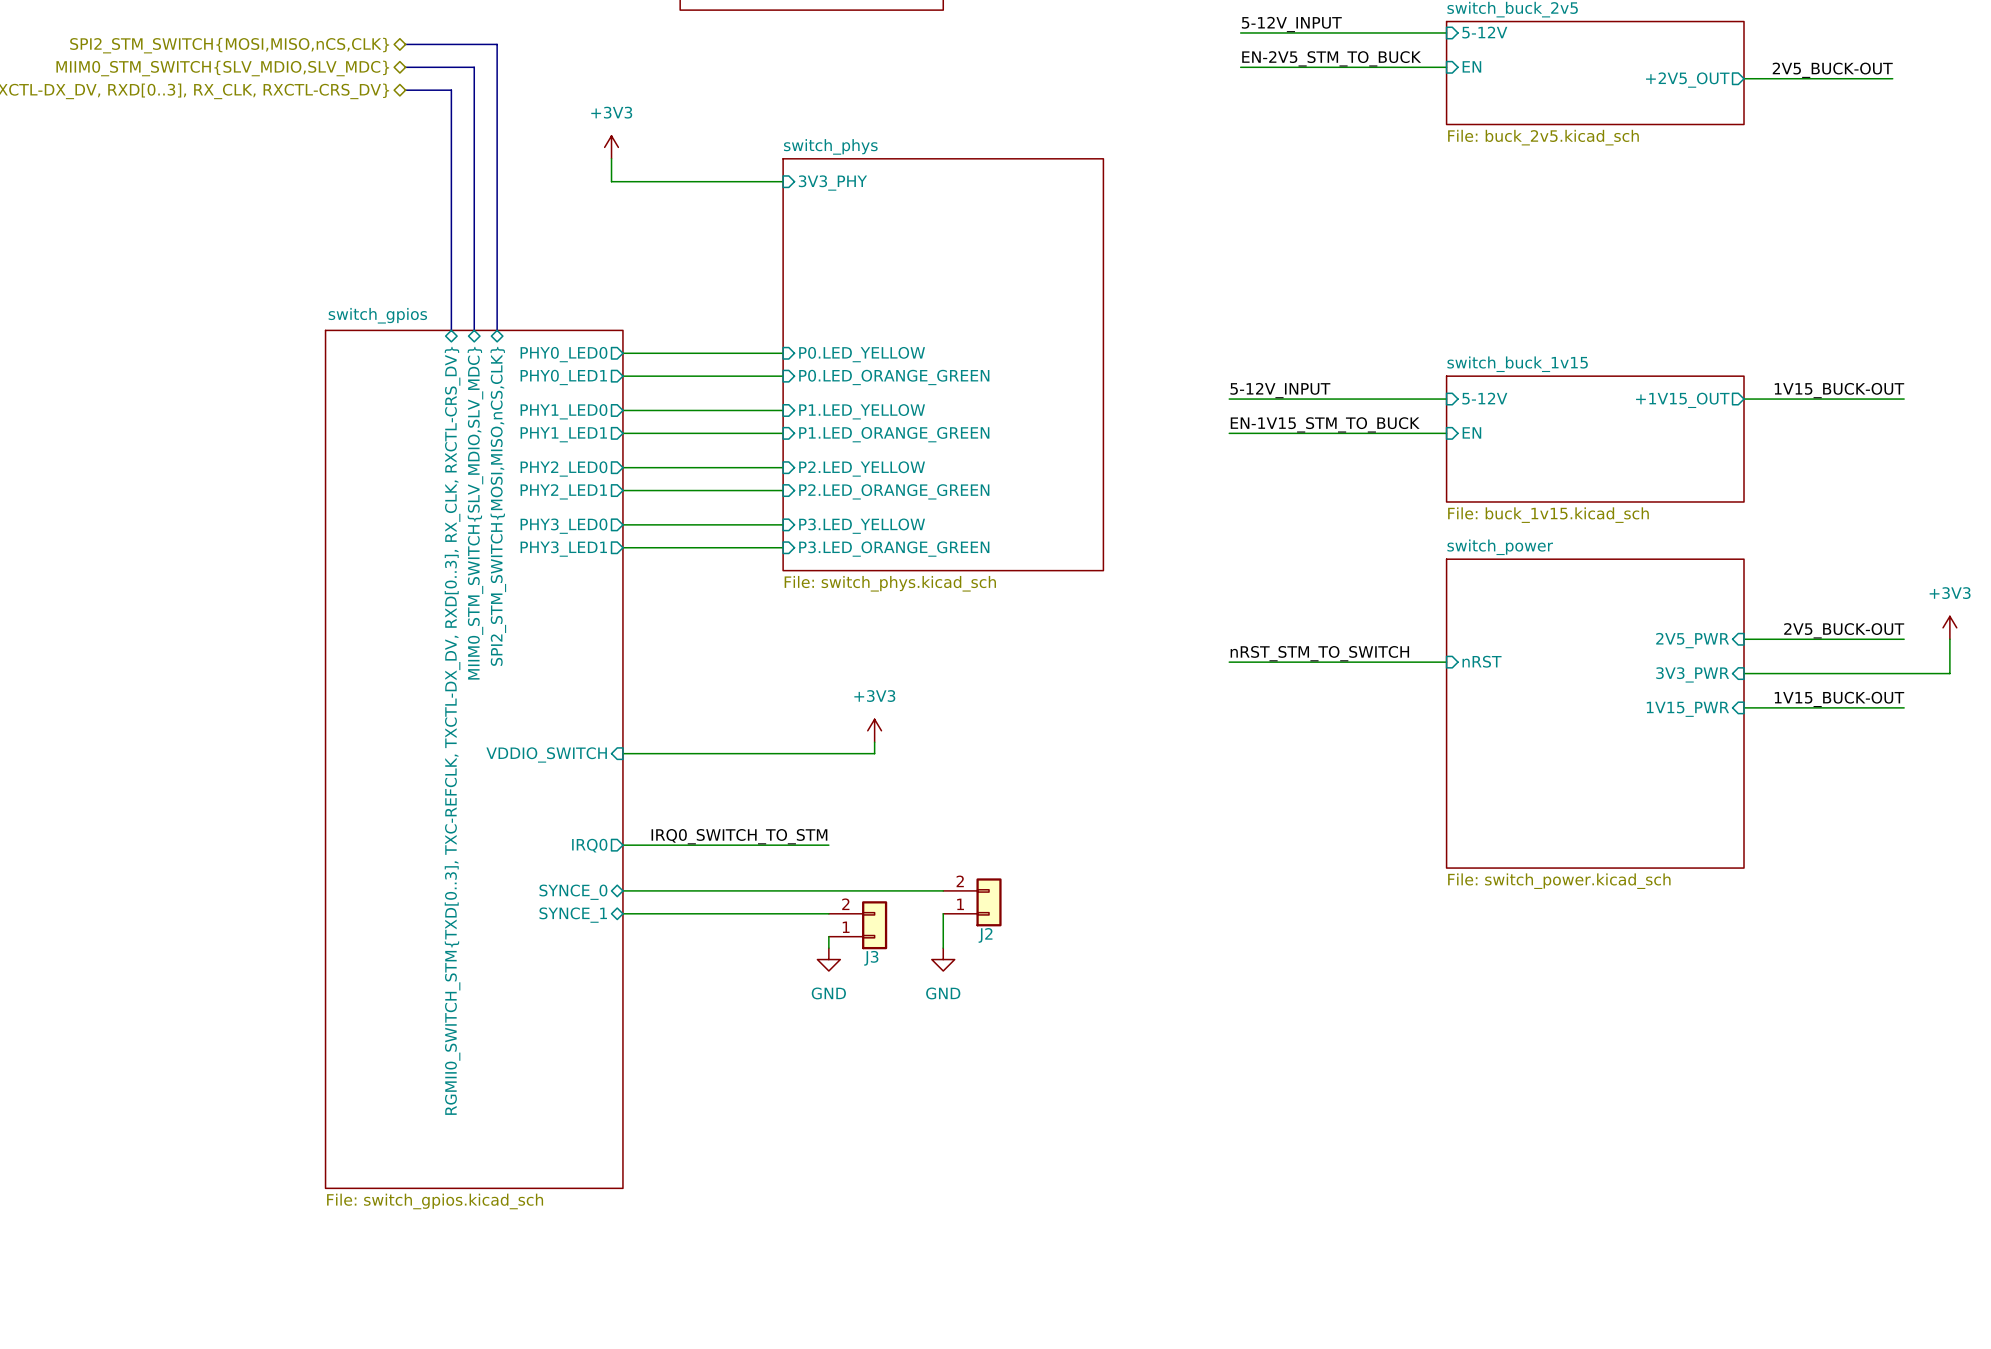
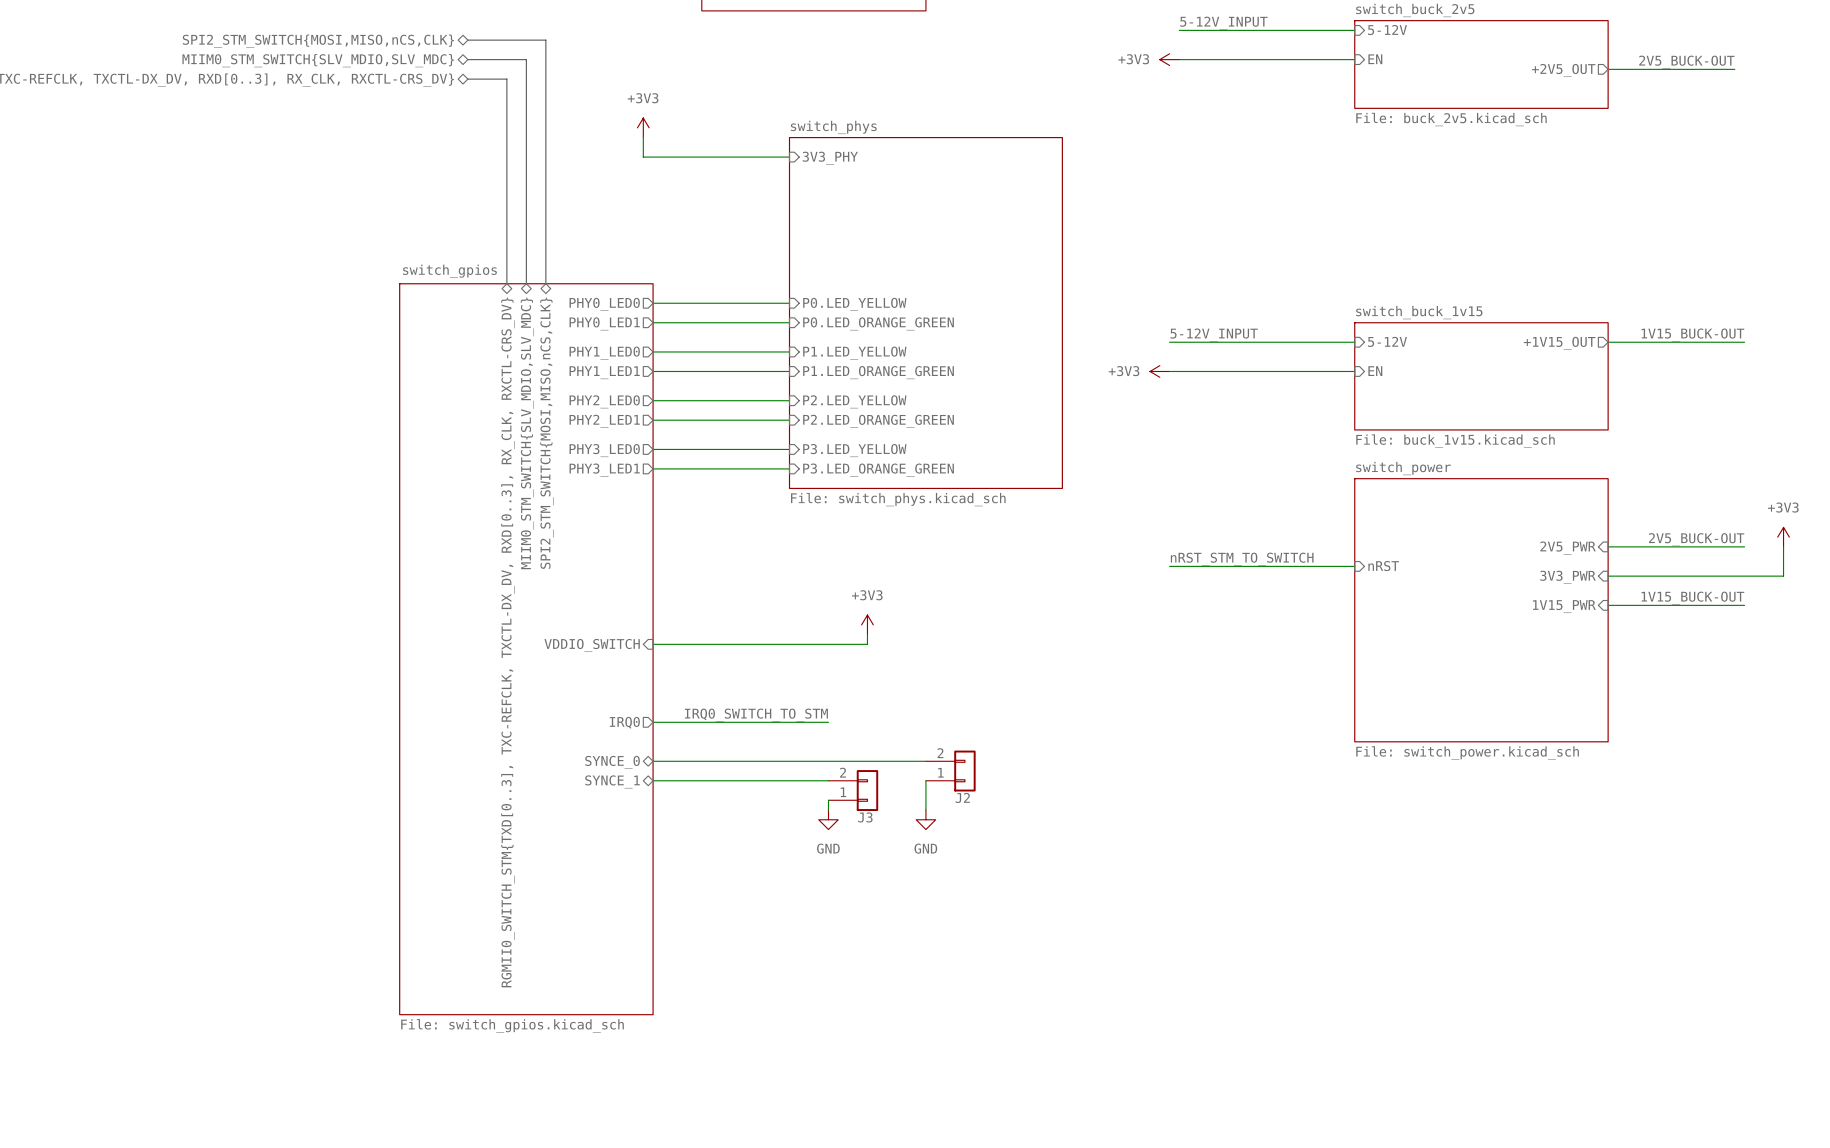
label: EN-2V5_STM_TO_BUCK (1331, 58) -> none
power symbol: none -> +3V3 (1169, 59)
label: EN-1V15_STM_TO_BUCK (1325, 424) -> none
power symbol: none -> +3V3 (1159, 371)

